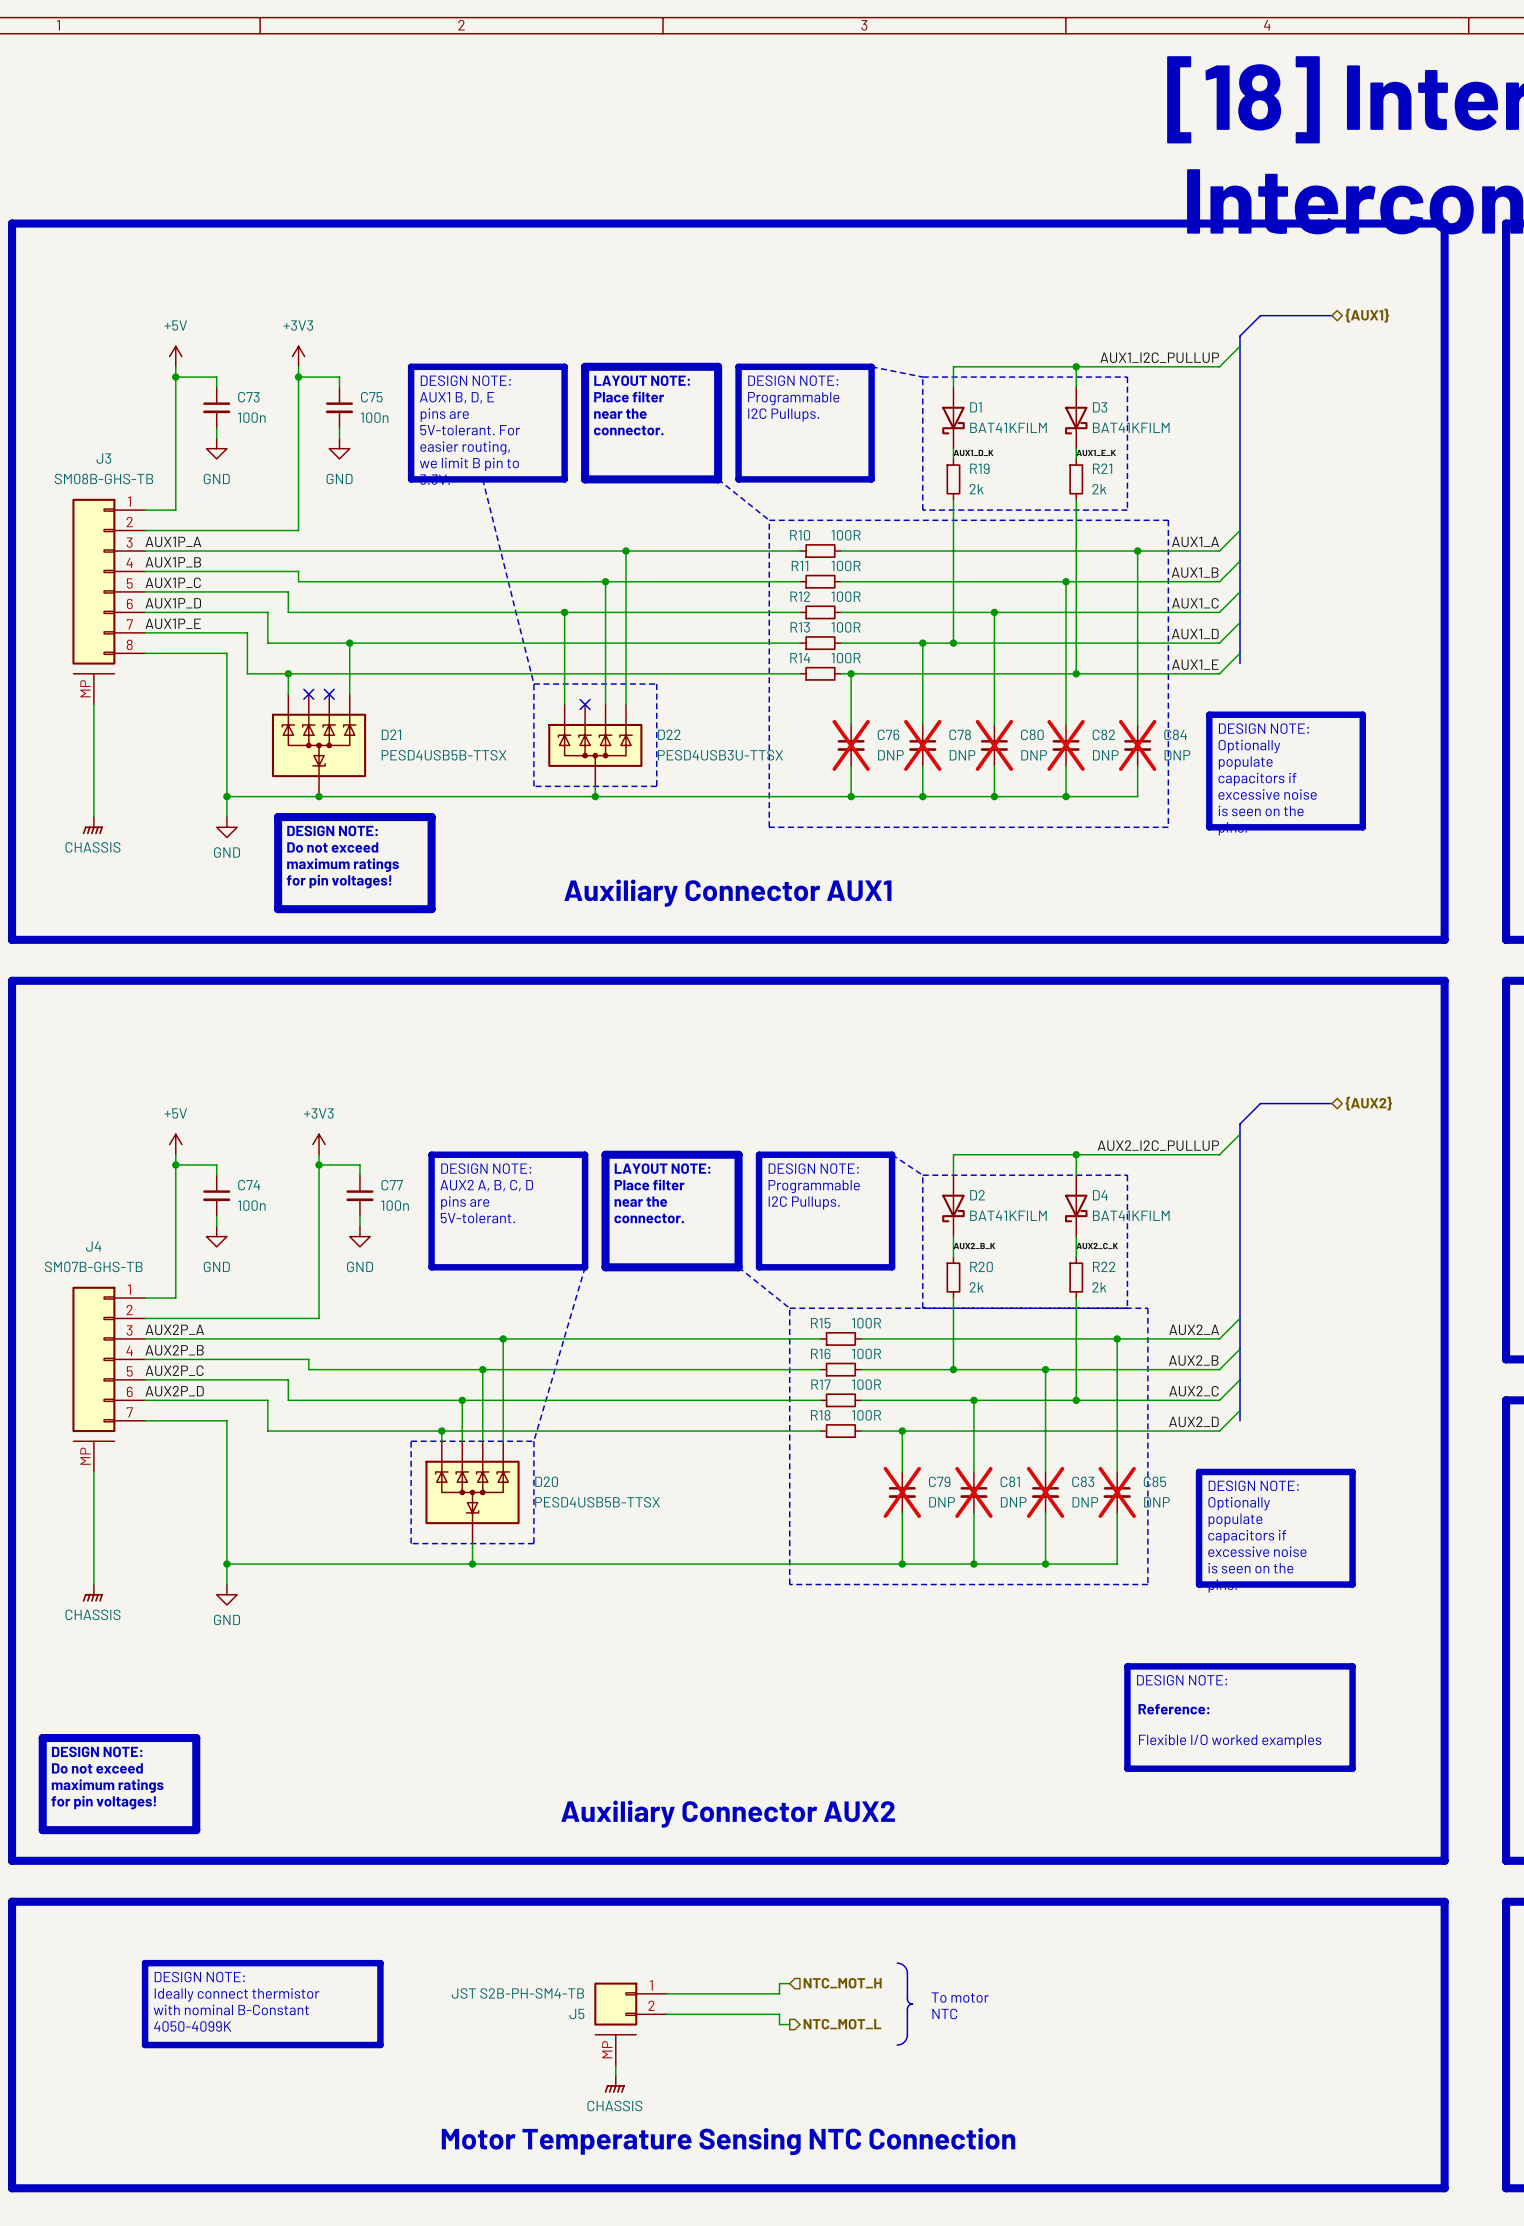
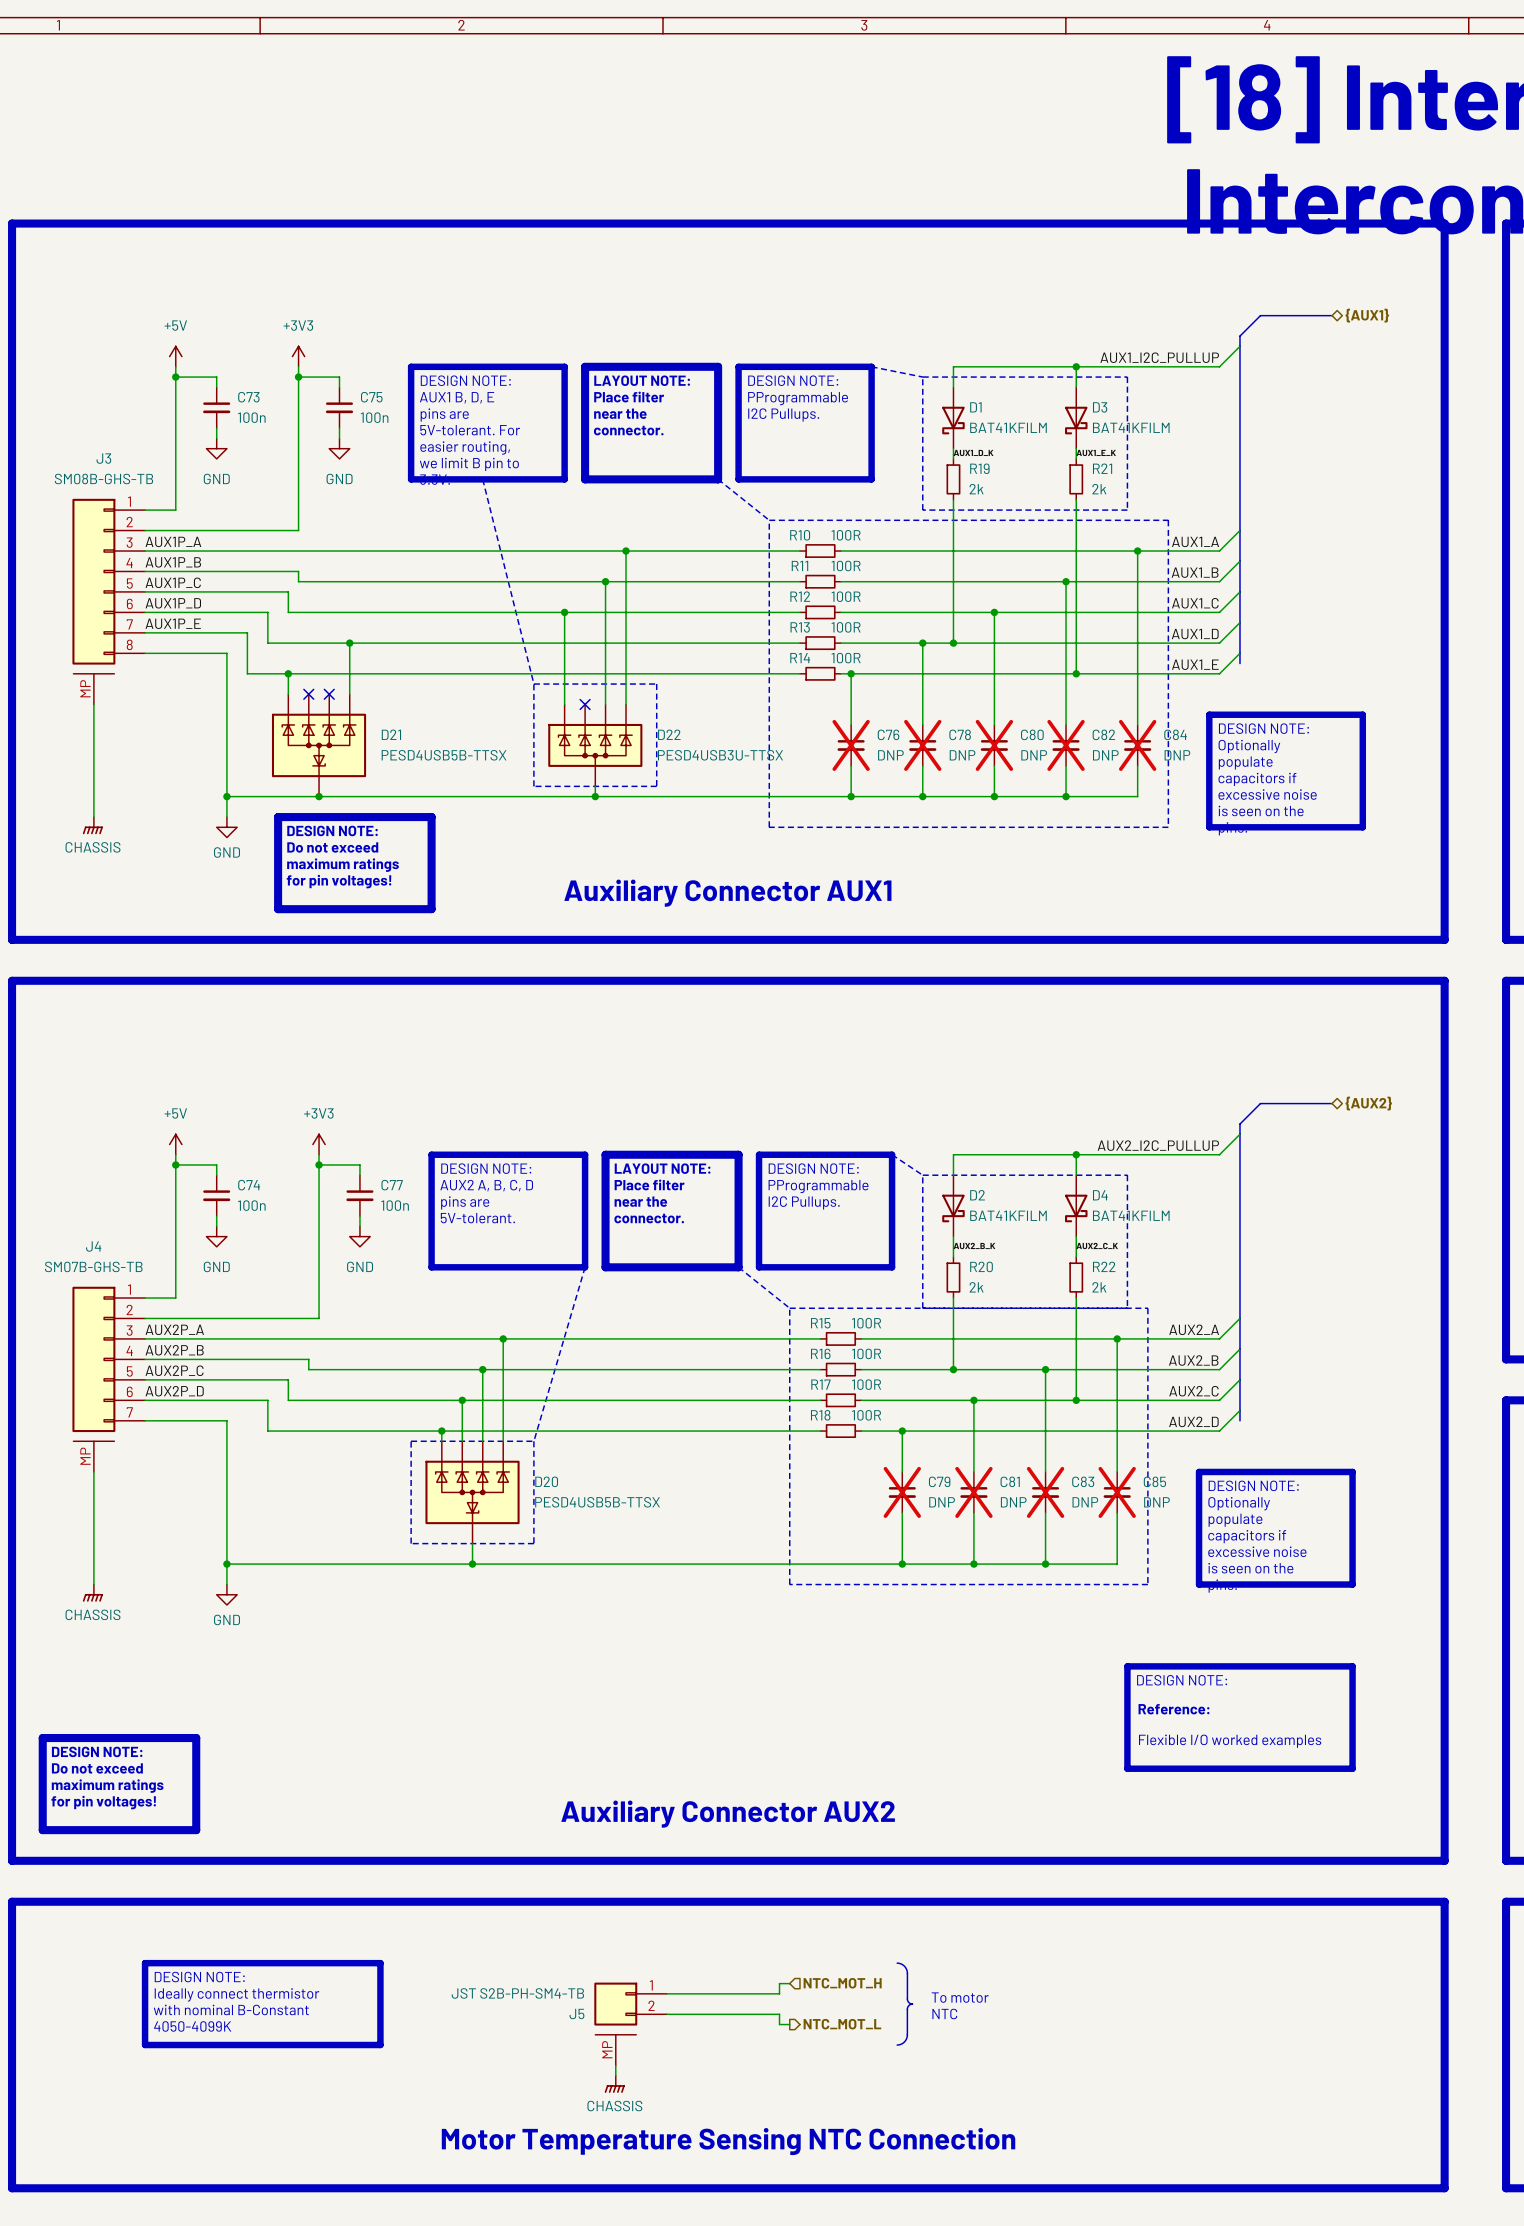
text: Programmable (793, 398) -> PProgrammable (798, 398)
text: Programmable (814, 1186) -> PProgrammable (818, 1186)

